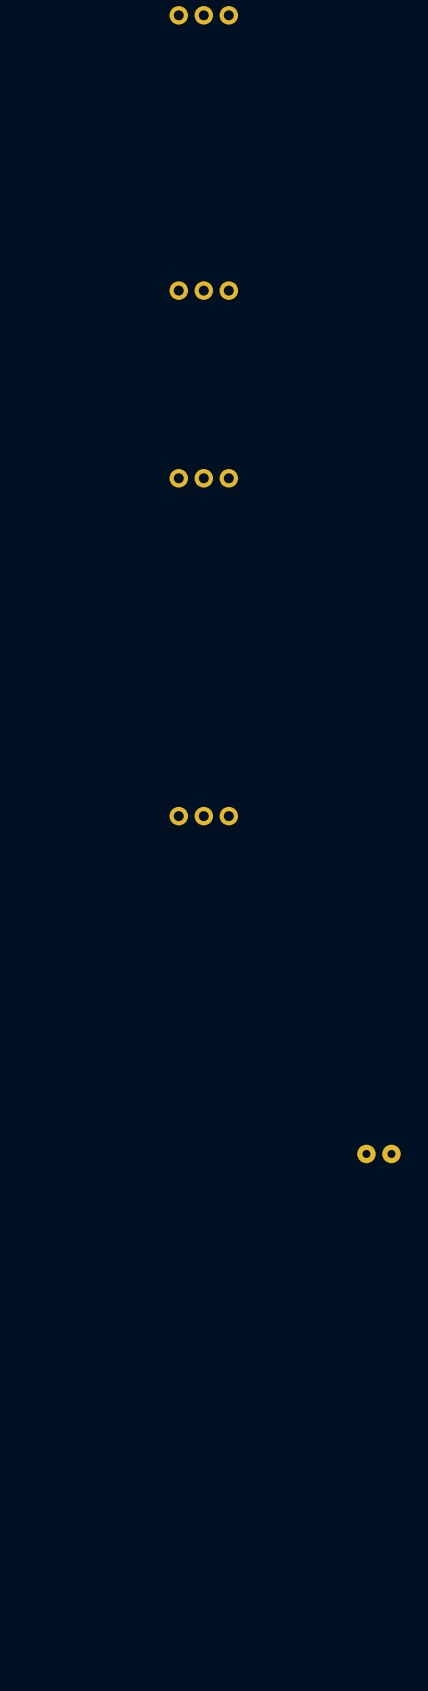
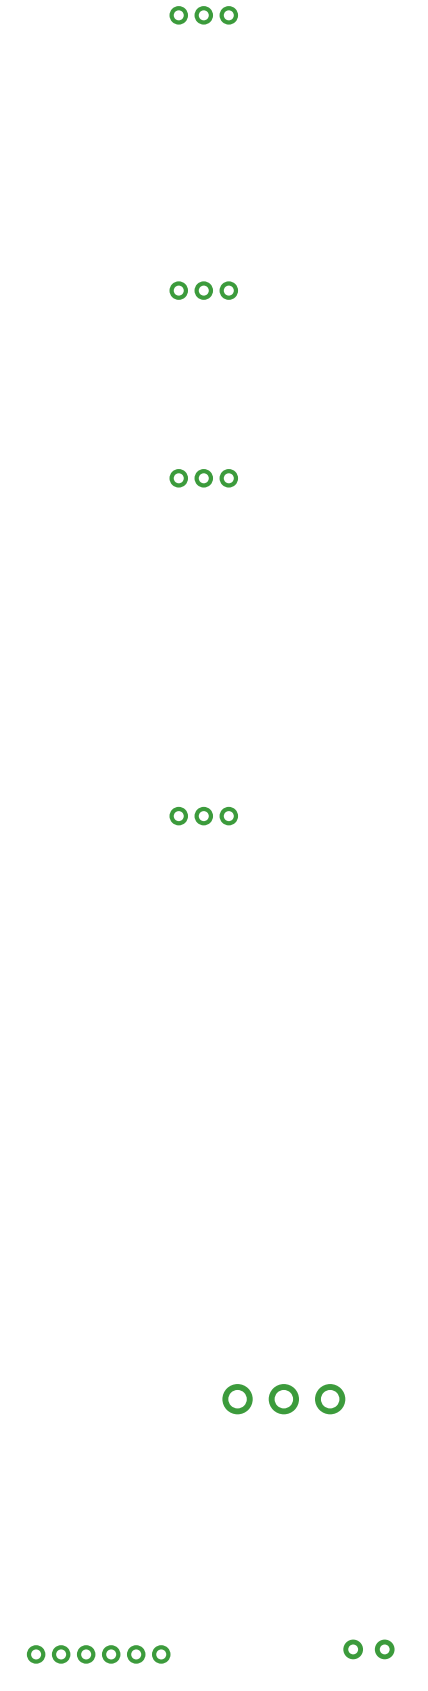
part: (378, 1153) -> none
part: none -> (283, 1399)
part: none -> (368, 1649)
part: none -> (98, 1654)

